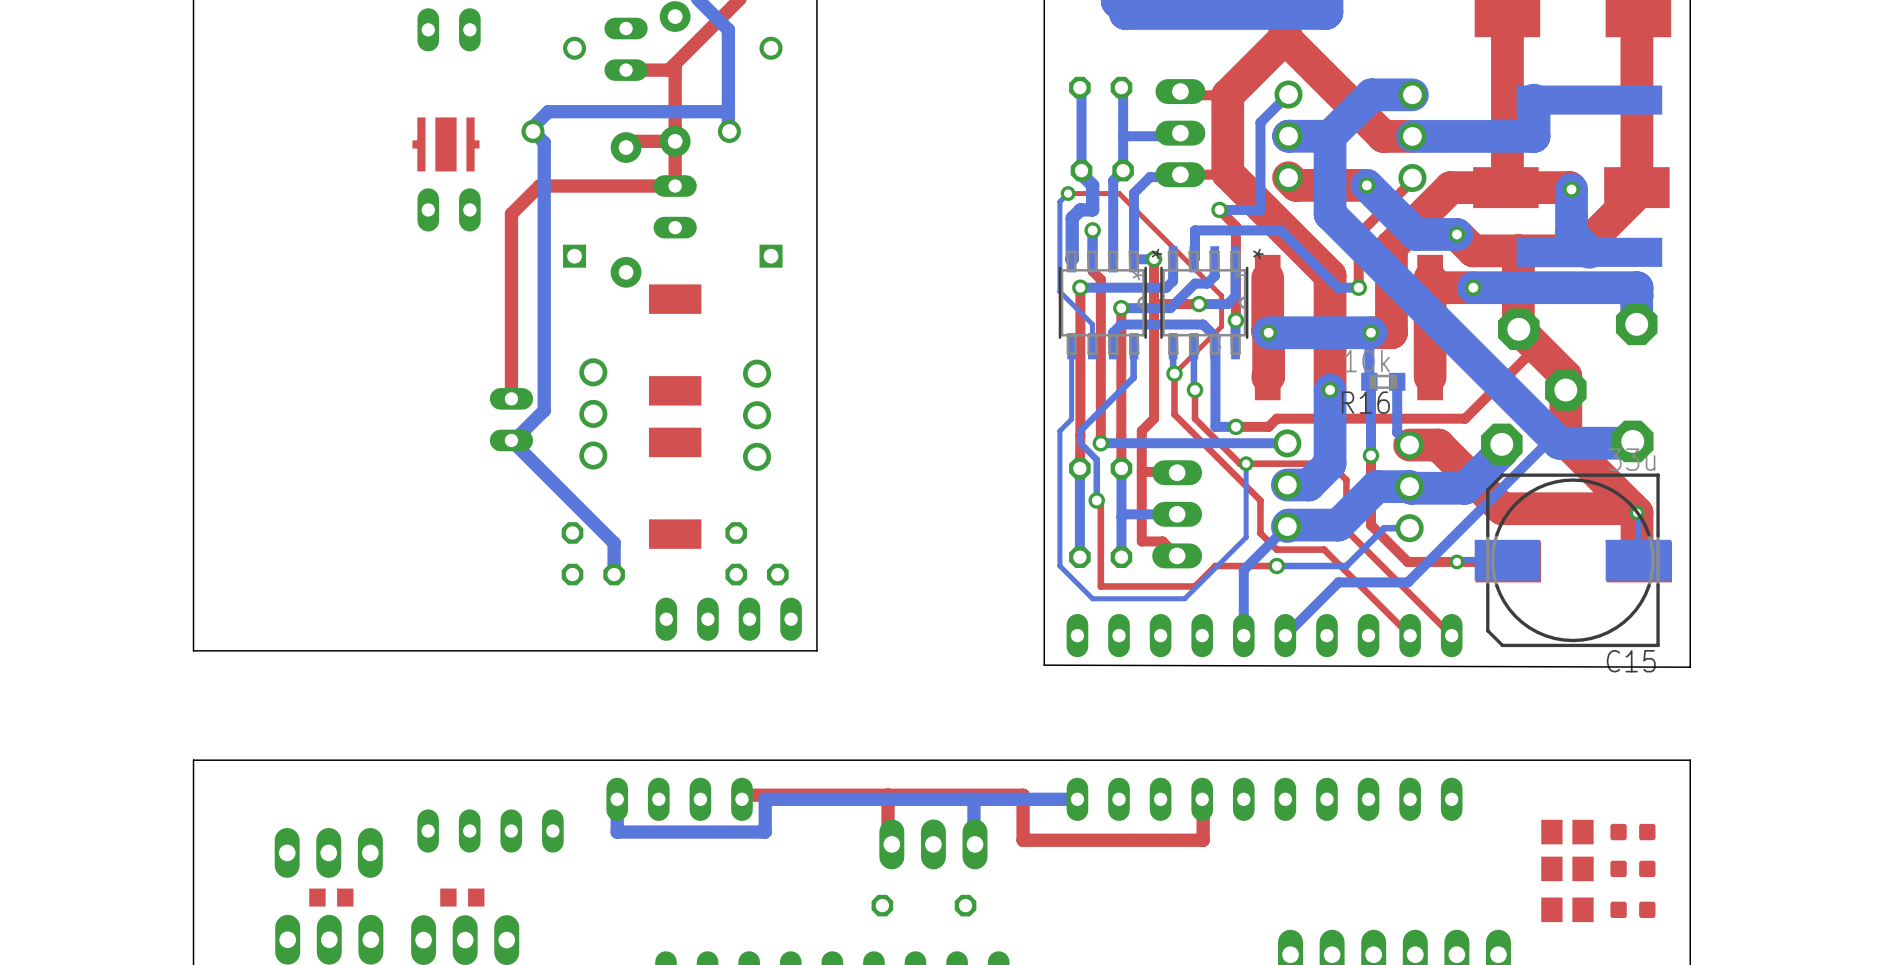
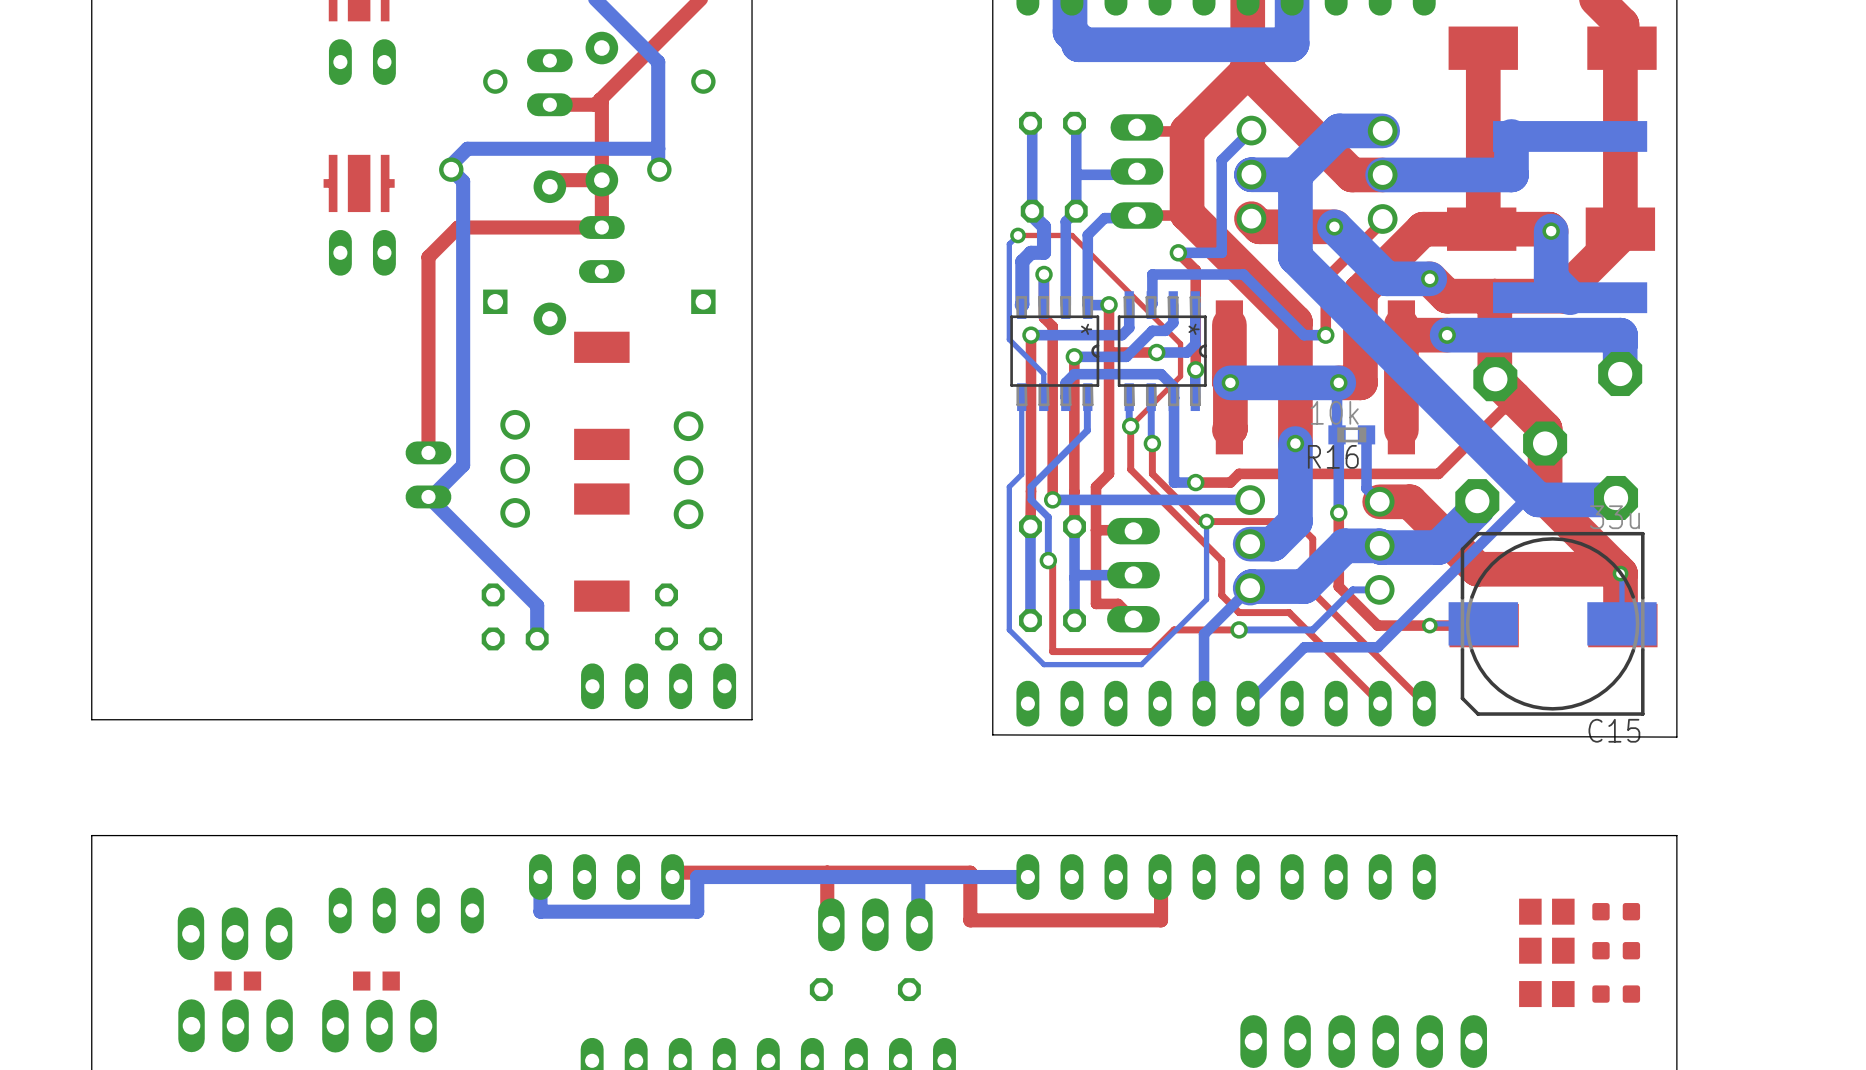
part footprint: [1058, 246, 1147, 360] -> [1010, 291, 1100, 412]
part footprint: [1160, 246, 1249, 360] -> [1117, 291, 1207, 412]

